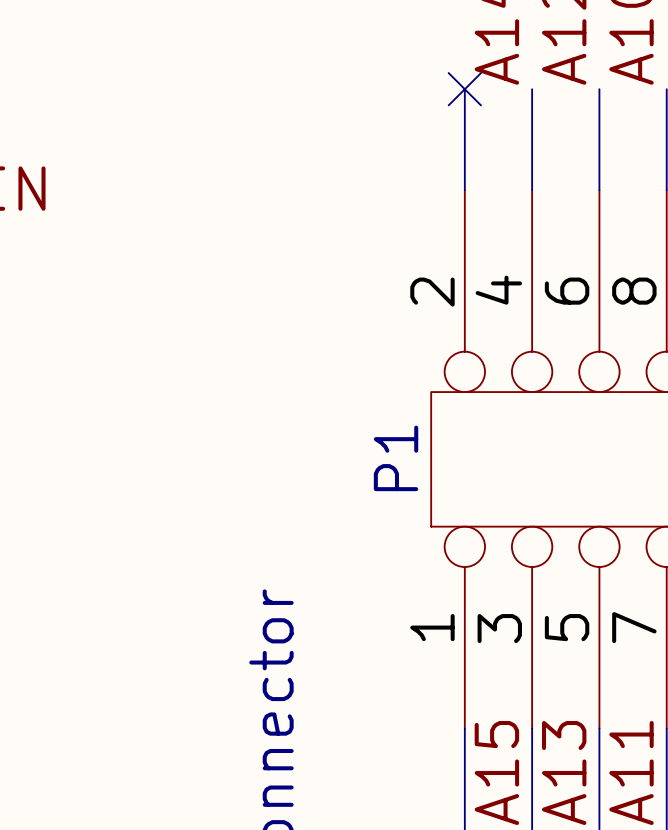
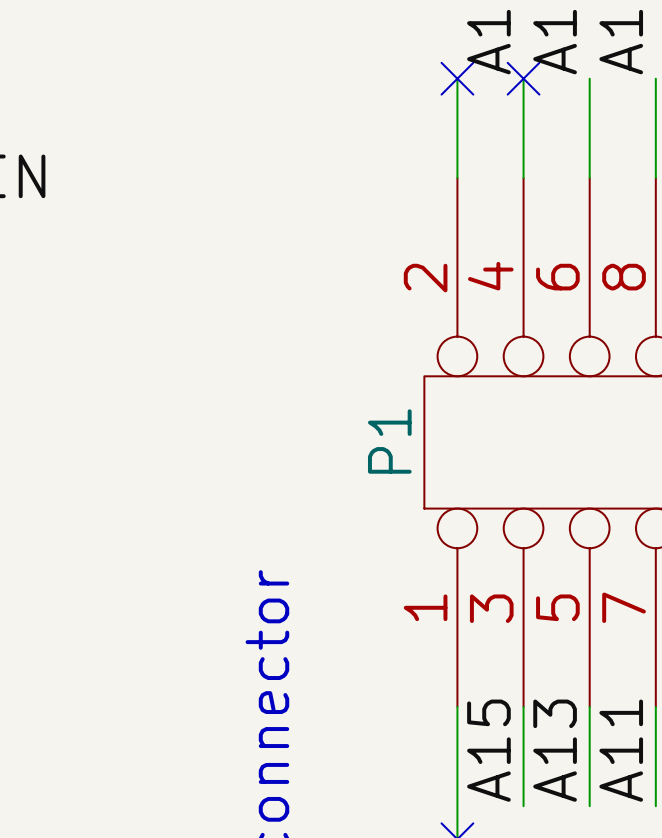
no-connect mark: none -> (523, 78)

